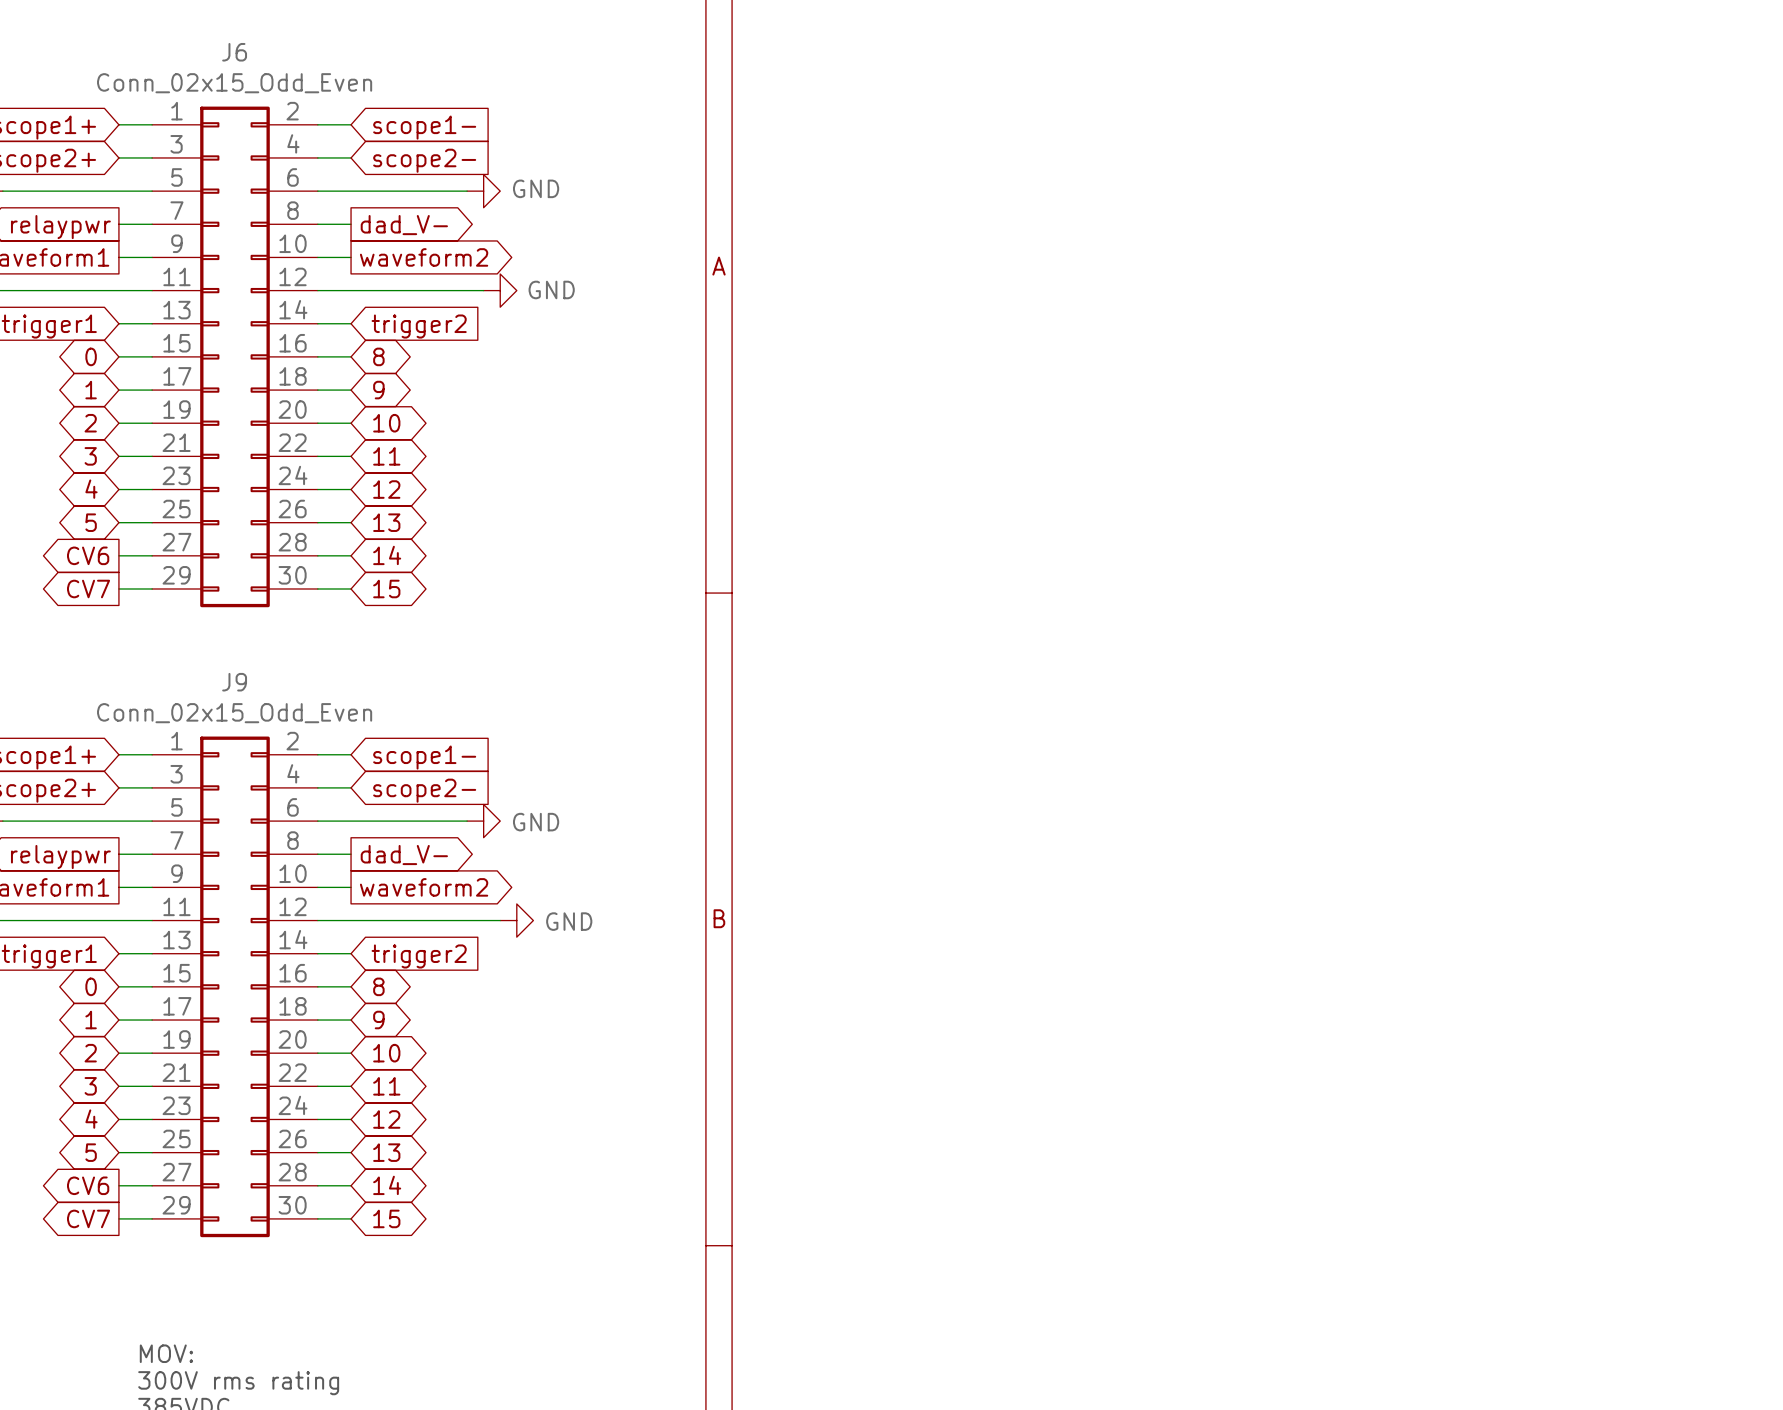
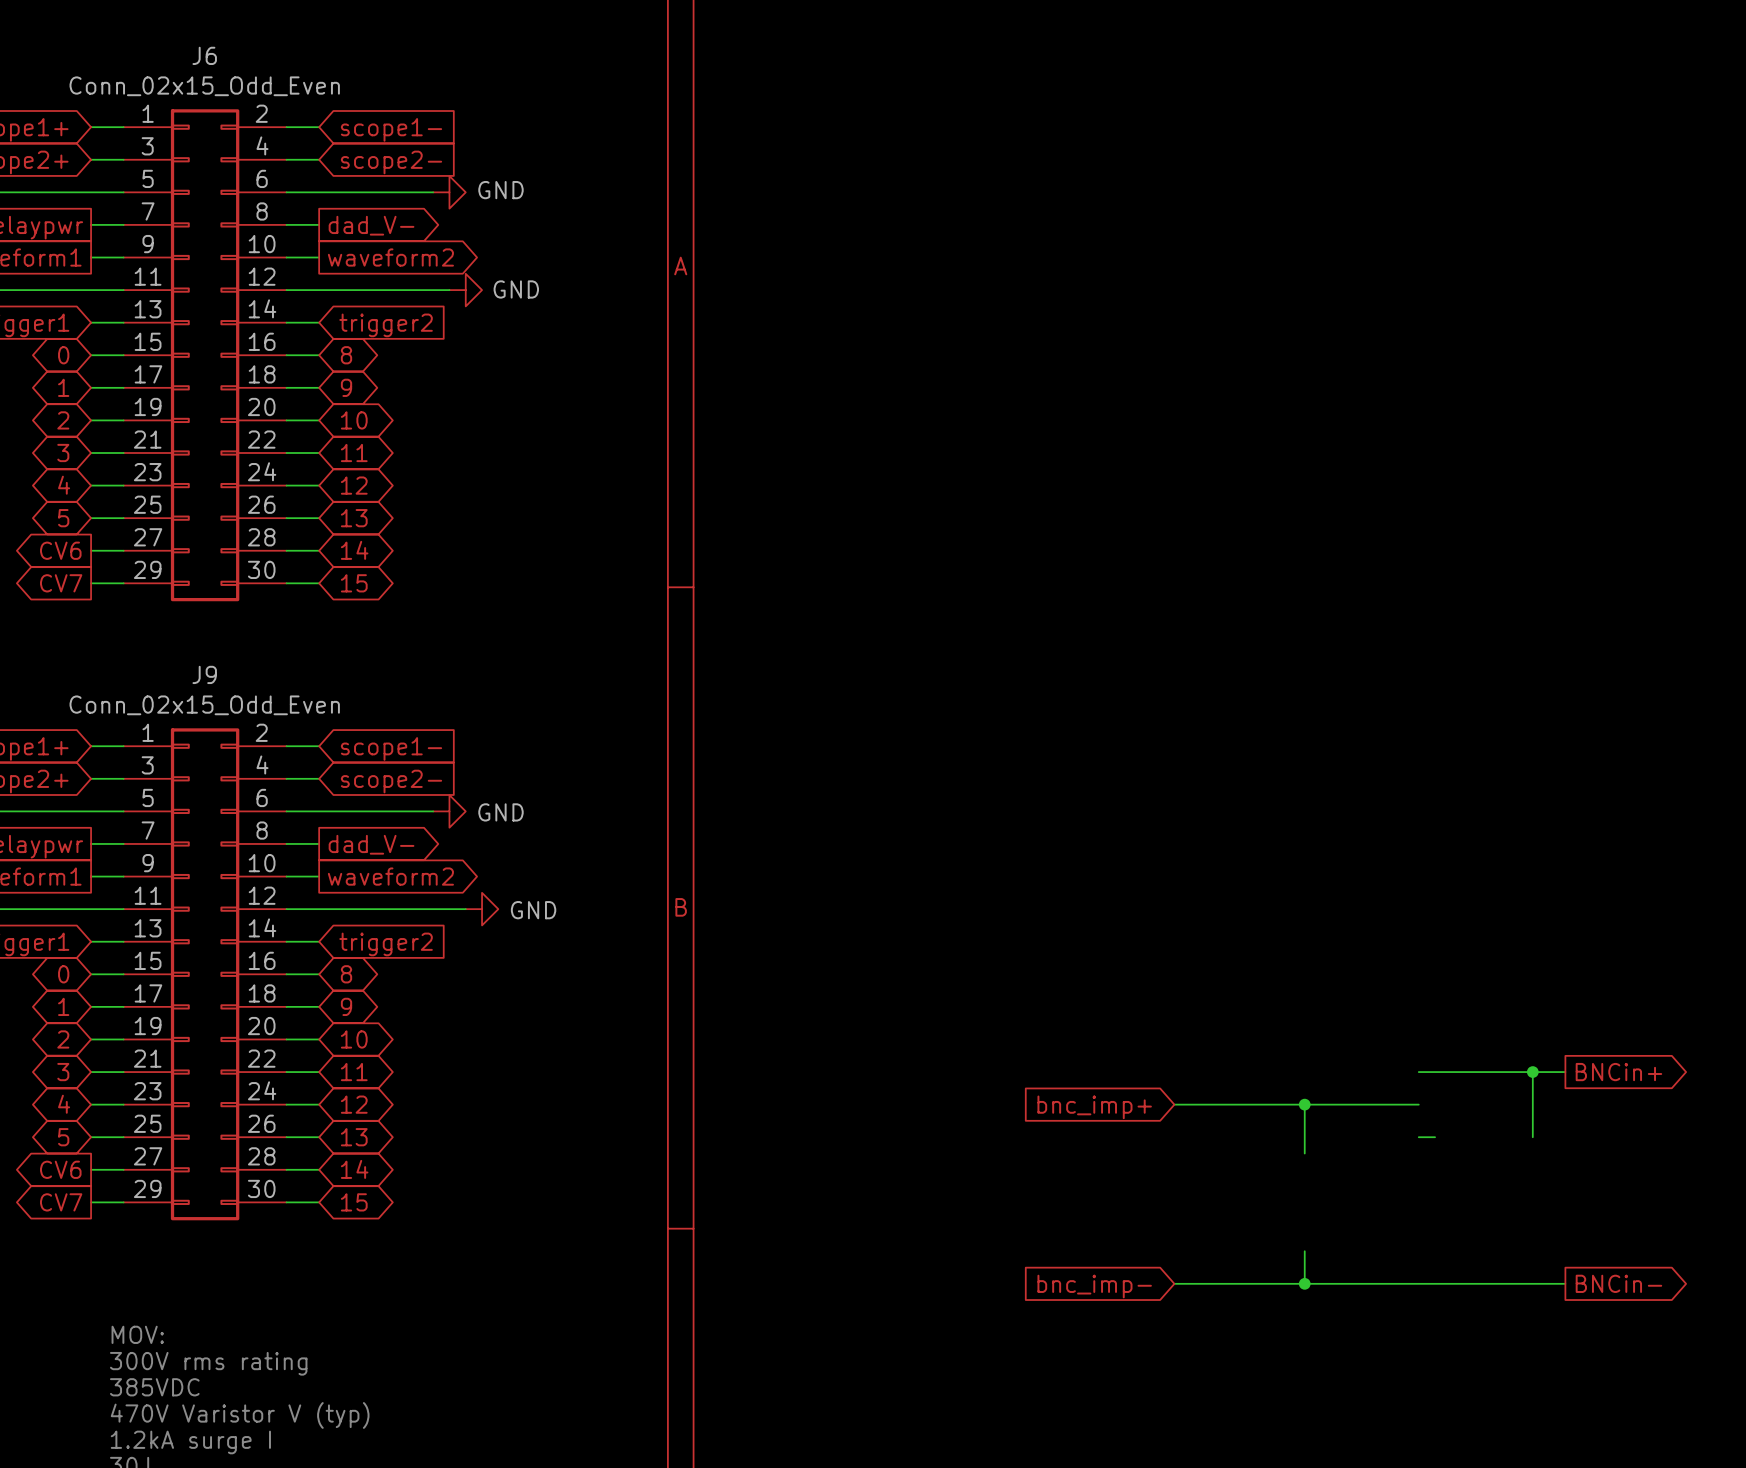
wire: none -> (1418, 1072) (1565, 1072)
wire: none -> (1532, 1072) (1532, 1137)
junction: none -> (1532, 1072)
global label: none -> BNCin+ (1618, 1072)
wire: none -> (1174, 1104) (1418, 1104)
wire: none -> (1304, 1104) (1304, 1153)
junction: none -> (1304, 1104)
global label: none -> bnc_imp+ (1094, 1107)
wire: none -> (1418, 1137) (1435, 1137)
wire: none -> (1304, 1251) (1304, 1283)
wire: none -> (1174, 1283) (1565, 1283)
junction: none -> (1304, 1283)
global label: none -> BNCin- (1618, 1283)
global label: none -> bnc_imp- (1094, 1286)

